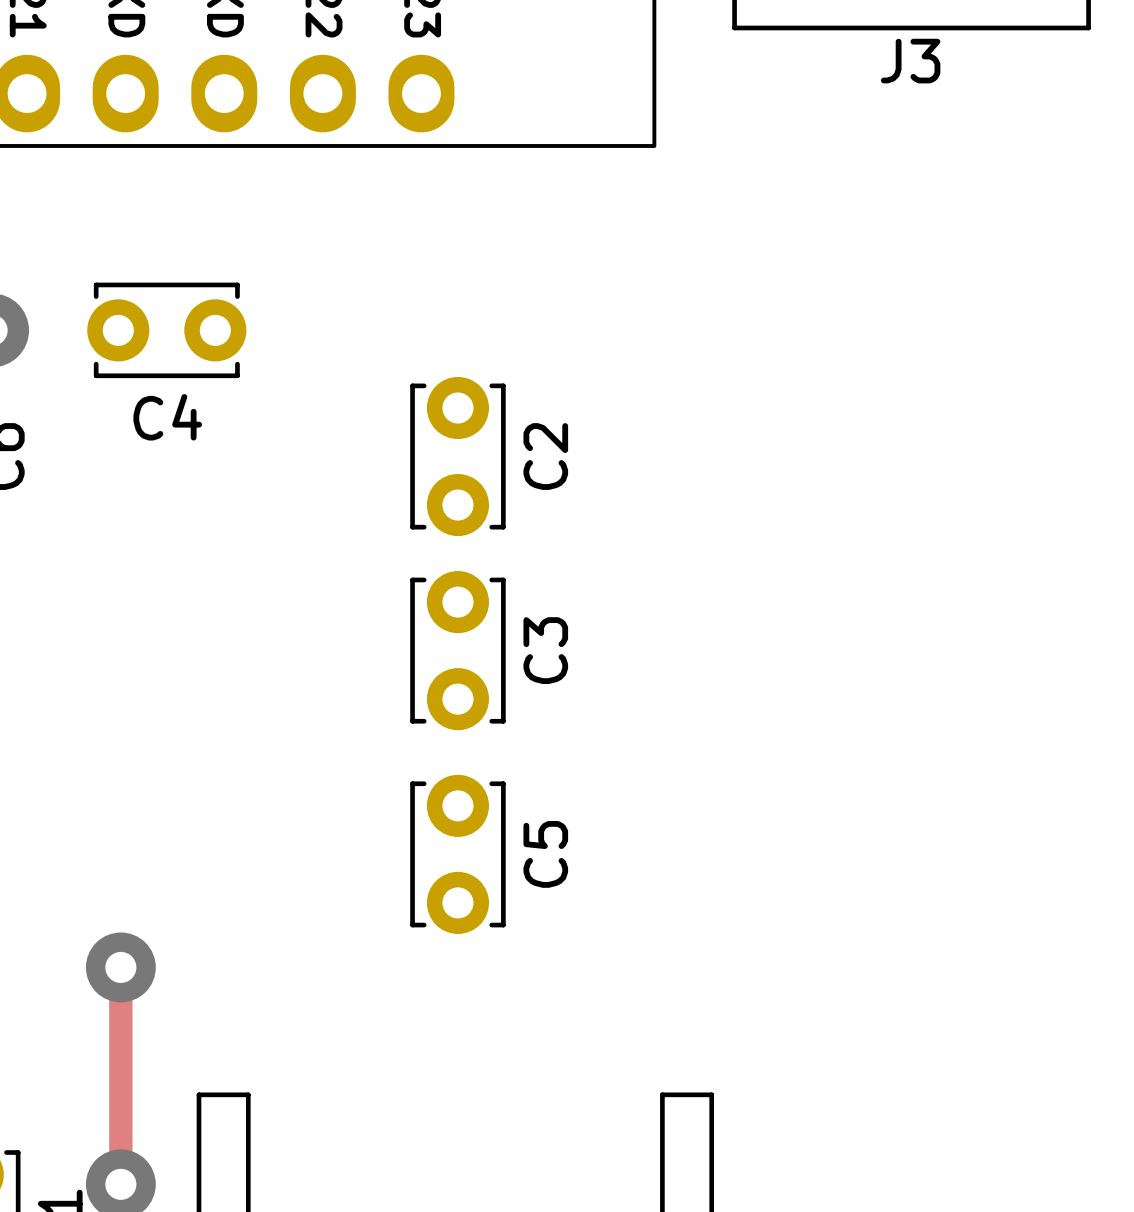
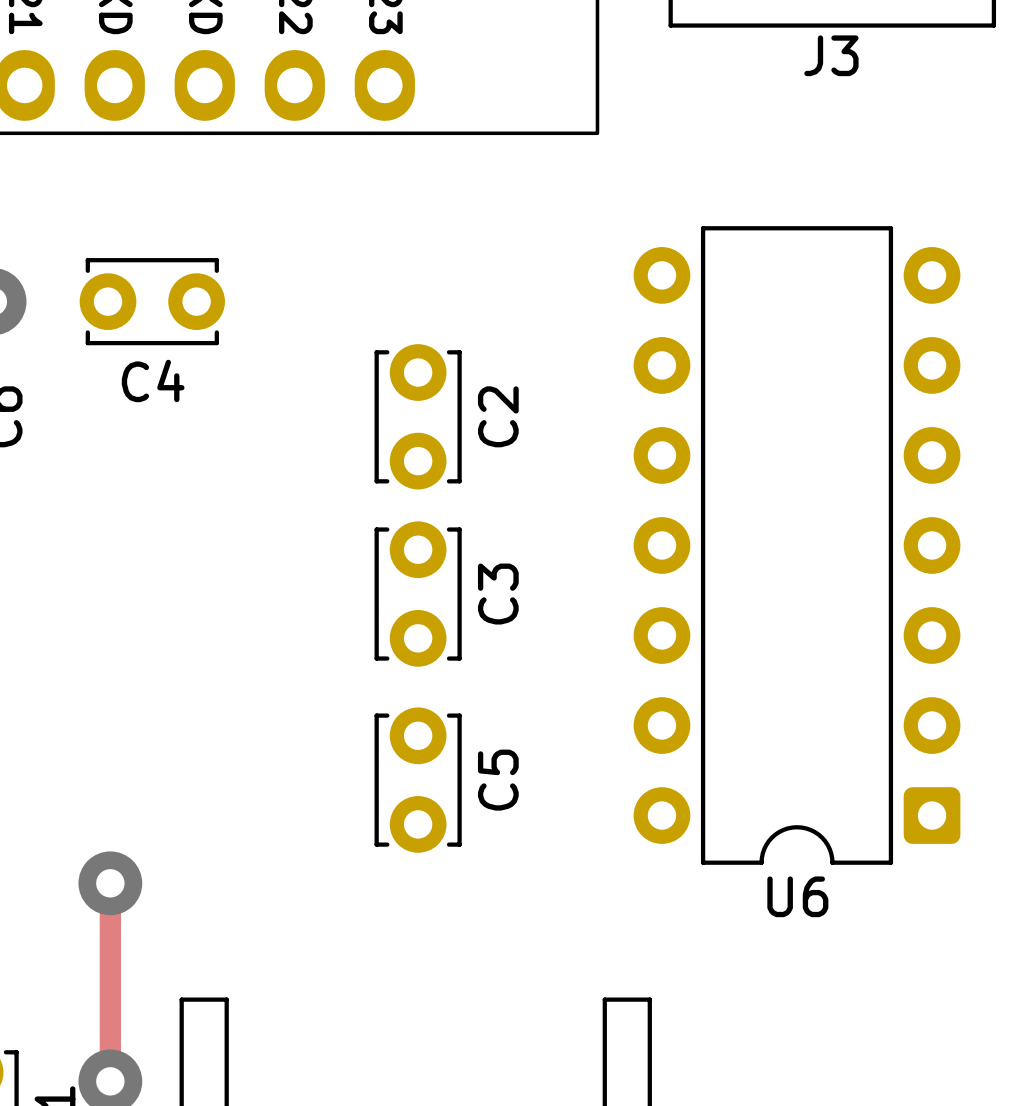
U6: none -> (797, 545)

